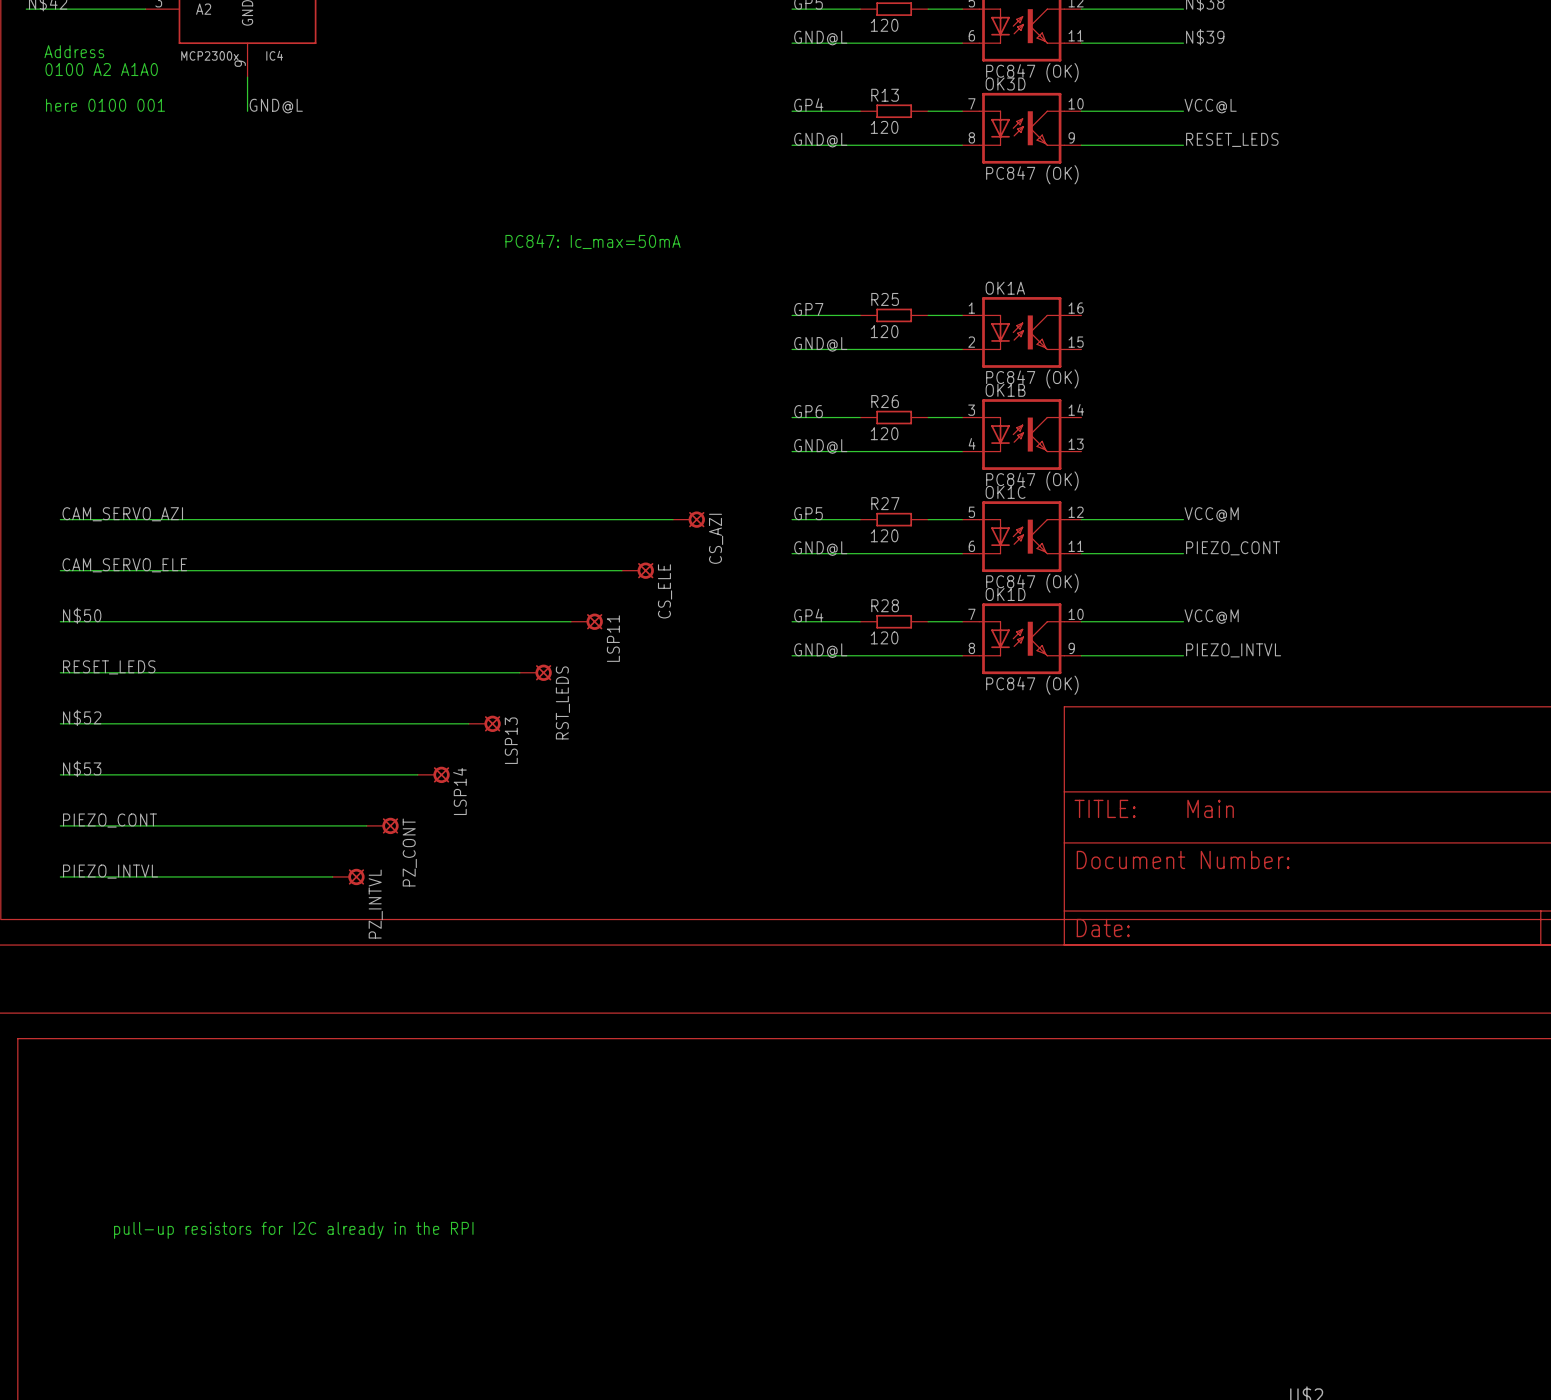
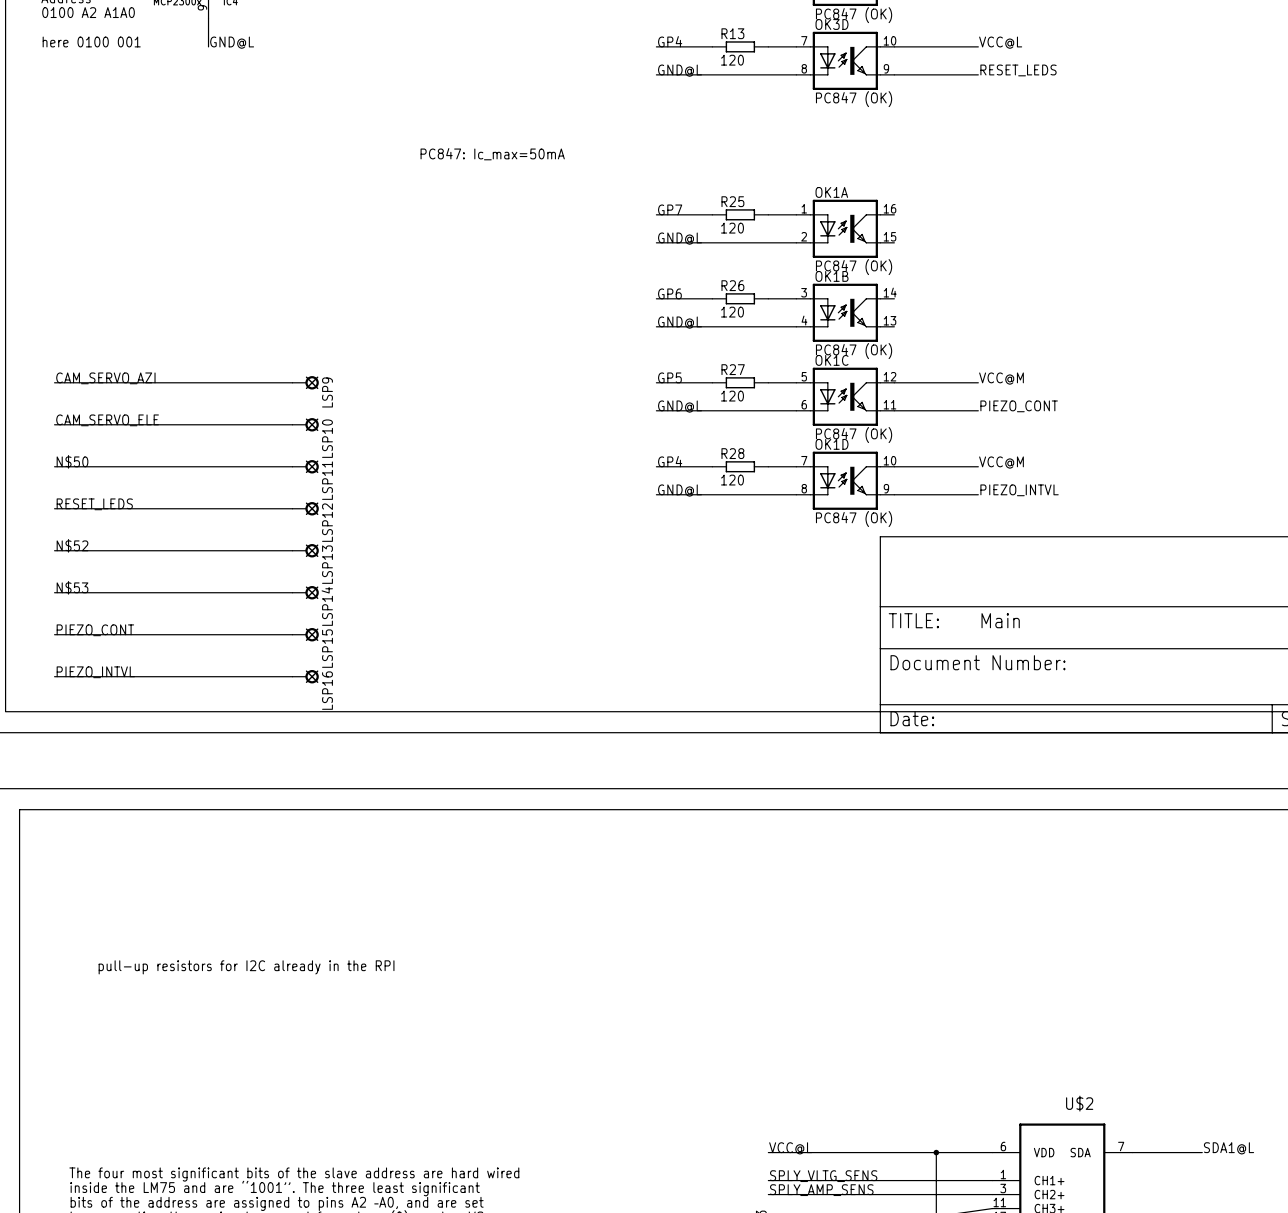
wire: (349, 519) (672, 519) -> none
LSP9: none -> (305, 382)
CS_AZI: (688, 519) -> none
wire: (349, 570) (621, 570) -> none
LSP10: none -> (305, 424)
CS_ELE: (637, 570) -> none
wire: (349, 621) (570, 621) -> none
LSP11 position: (586, 621) -> (305, 466)
wire: (349, 672) (519, 672) -> none
LSP12: none -> (305, 508)
RST_LEDS: (535, 672) -> none
wire: (349, 723) (468, 723) -> none
LSP13 position: (484, 723) -> (305, 550)
wire: (349, 774) (417, 774) -> none
LSP14 position: (433, 774) -> (305, 592)
LSP15: none -> (305, 634)
PZ_CONT: (382, 825) -> none
PZ_INTVL: (348, 876) -> none
LSP16: none -> (305, 676)

